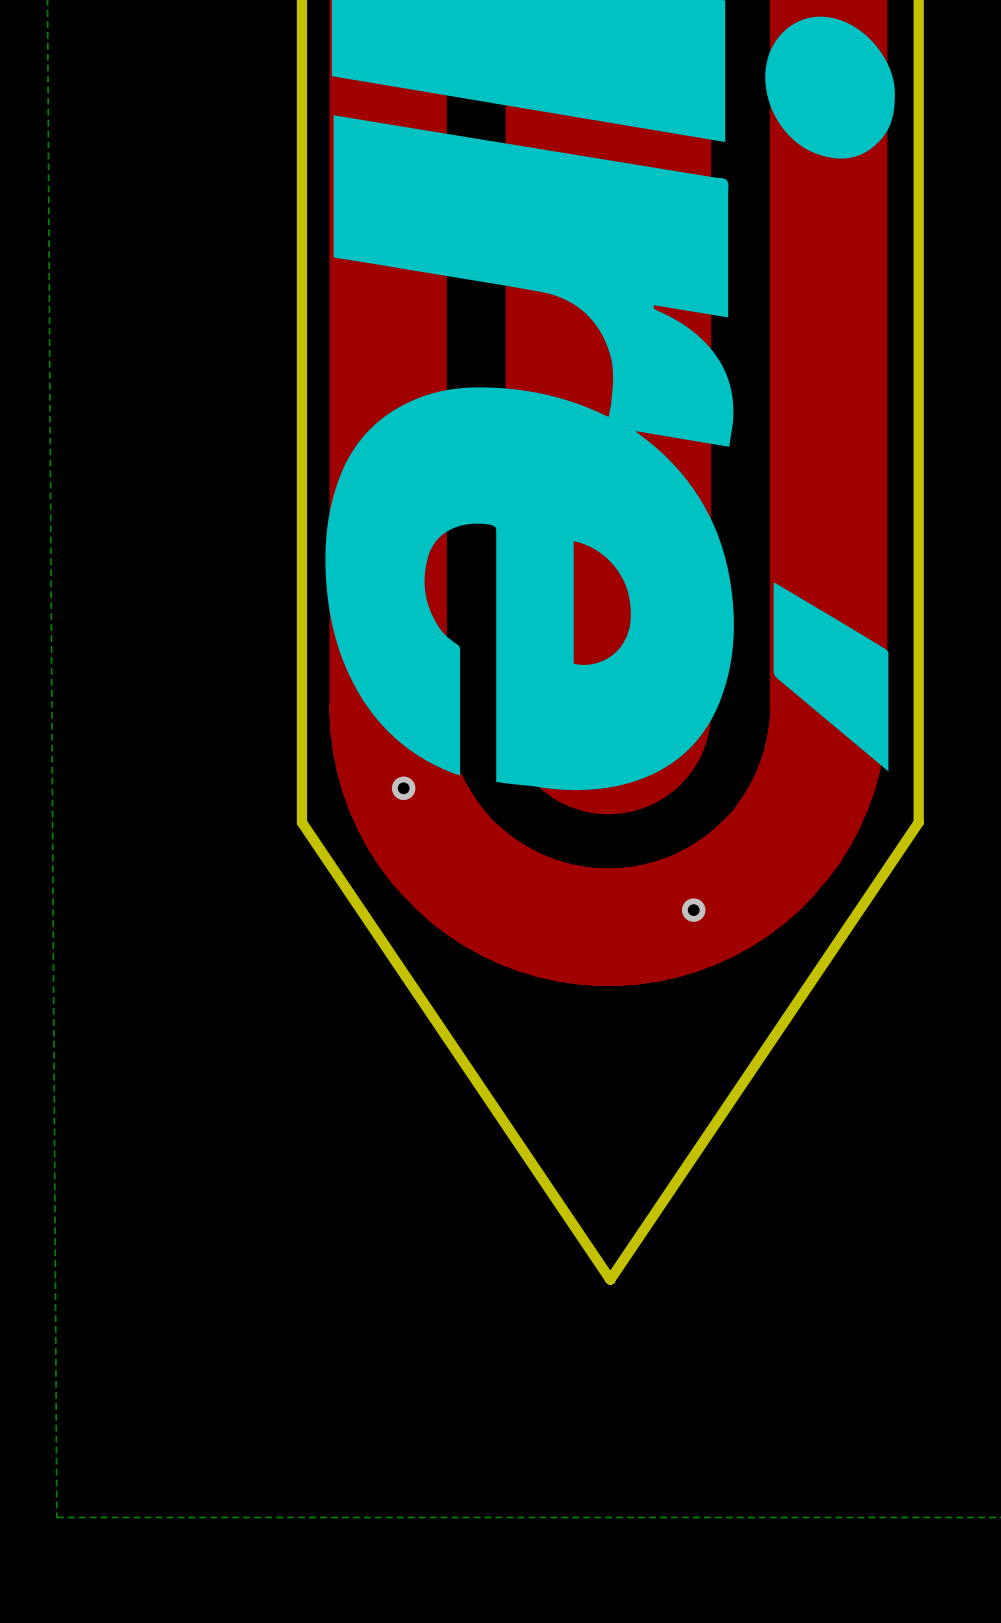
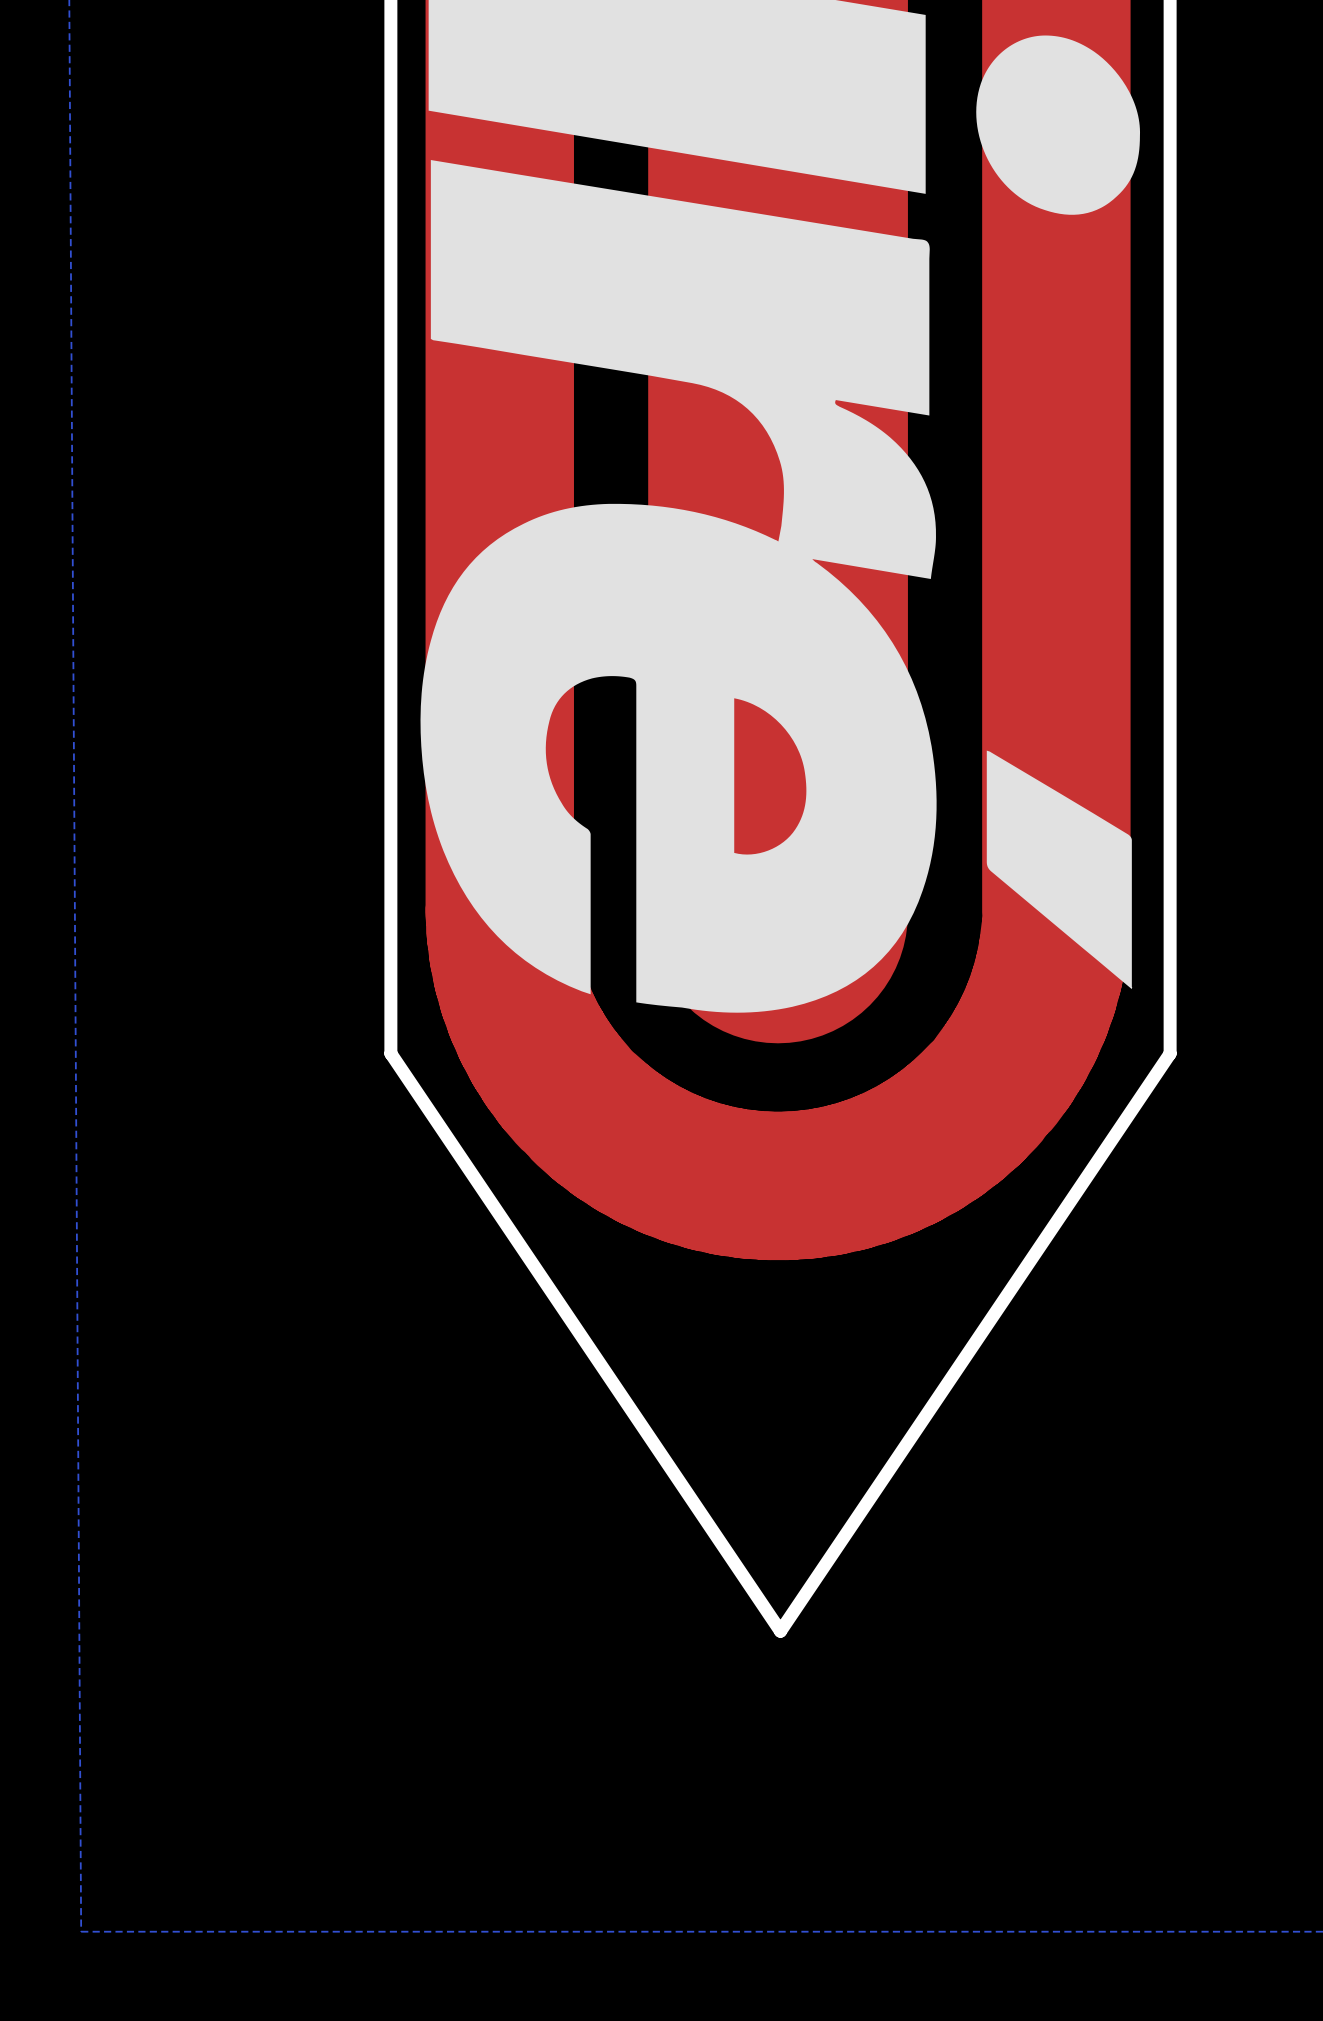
via: (403, 788) -> none
via: (693, 910) -> none

